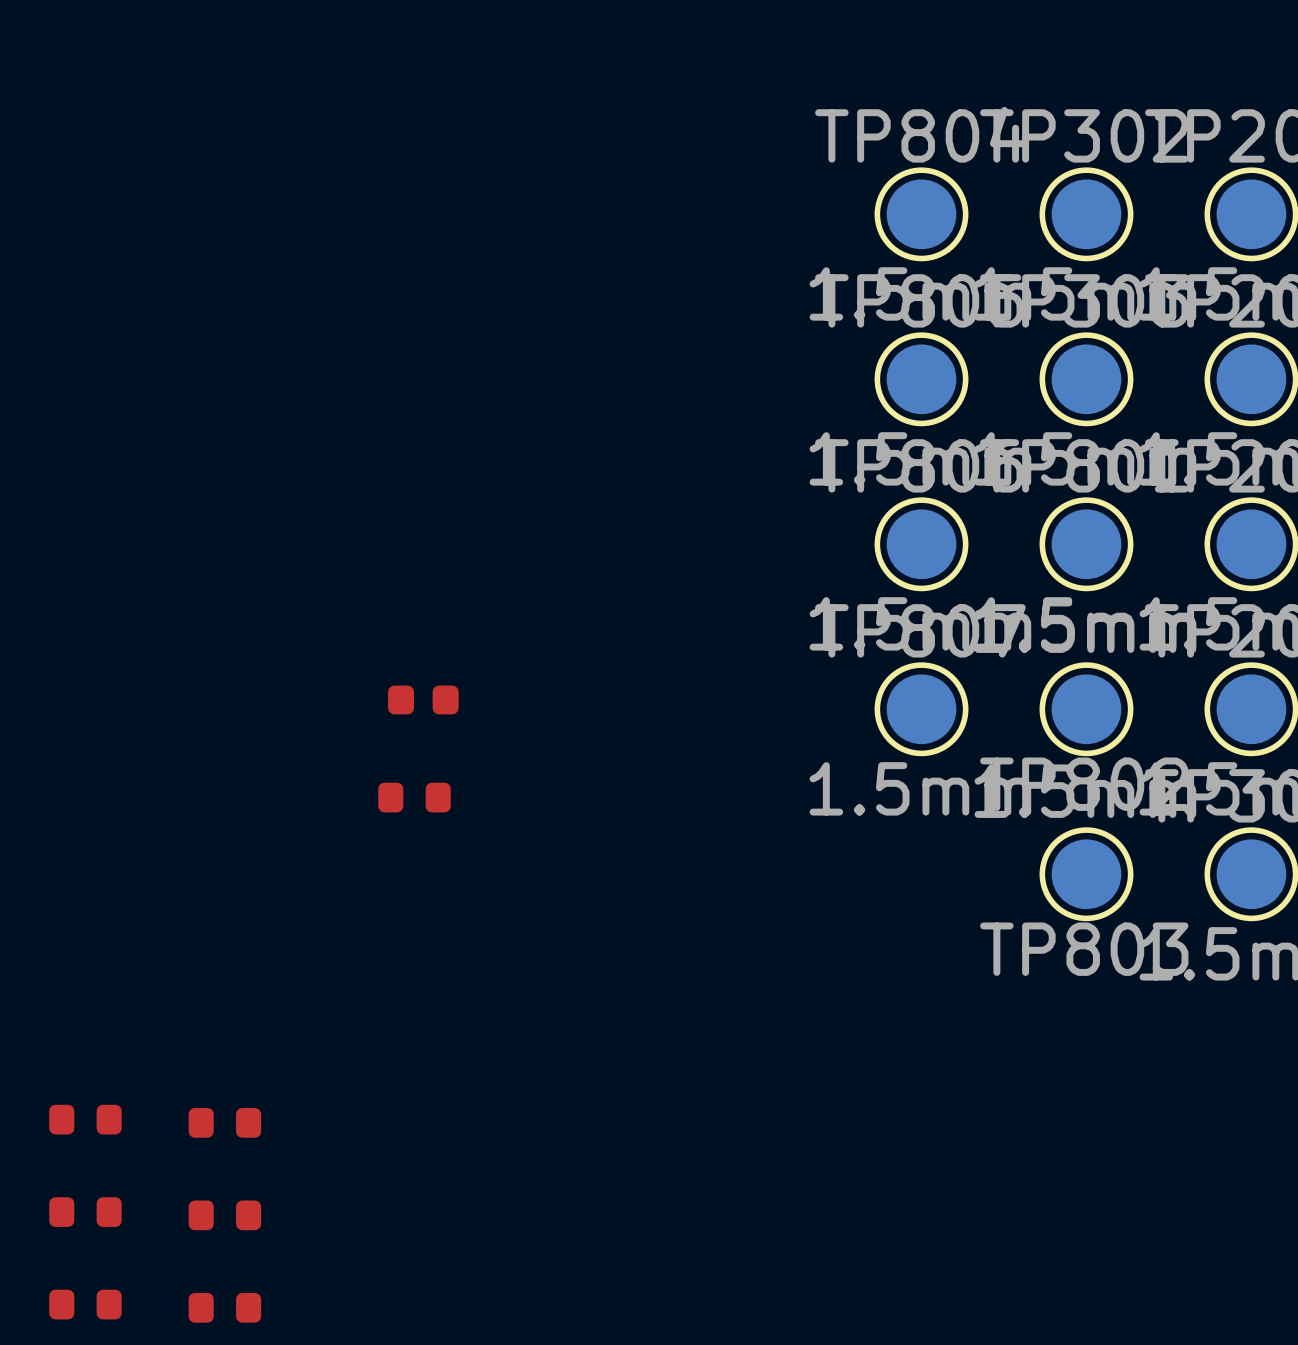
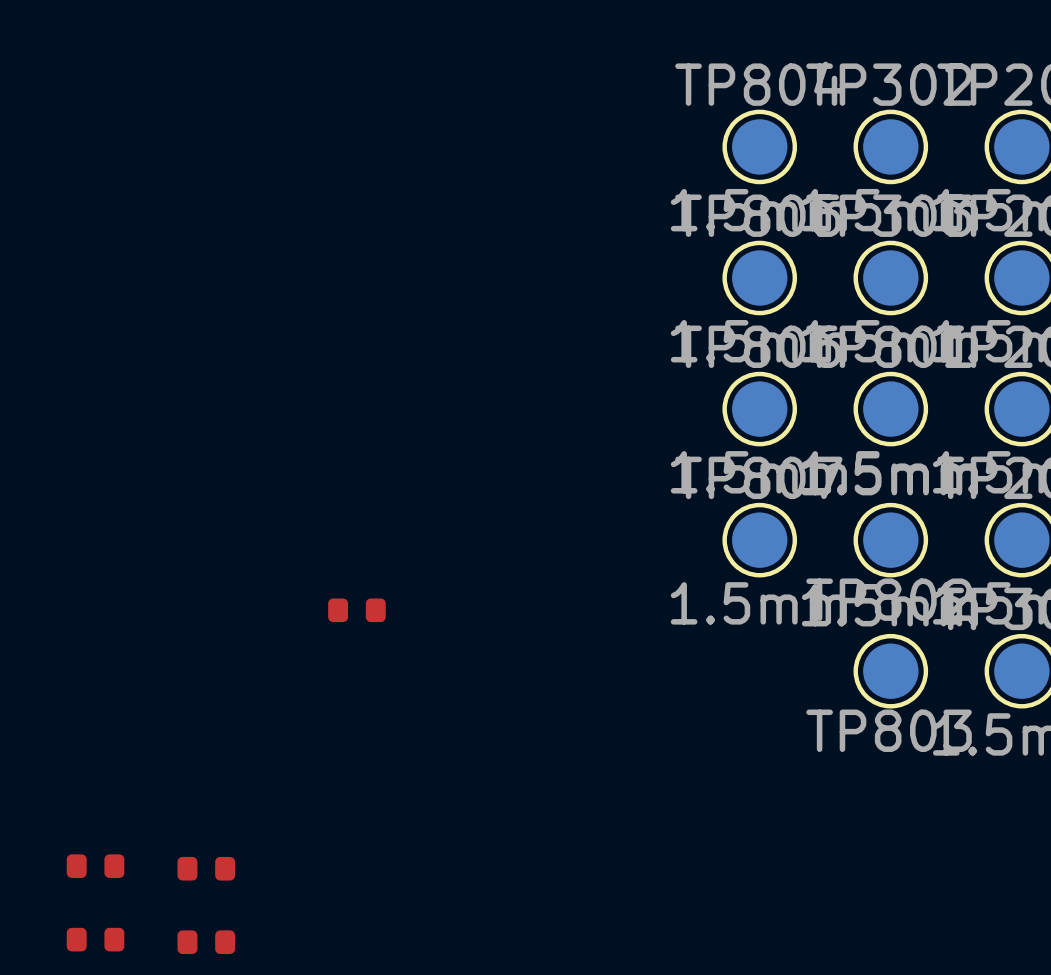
part: (423, 699) -> none

